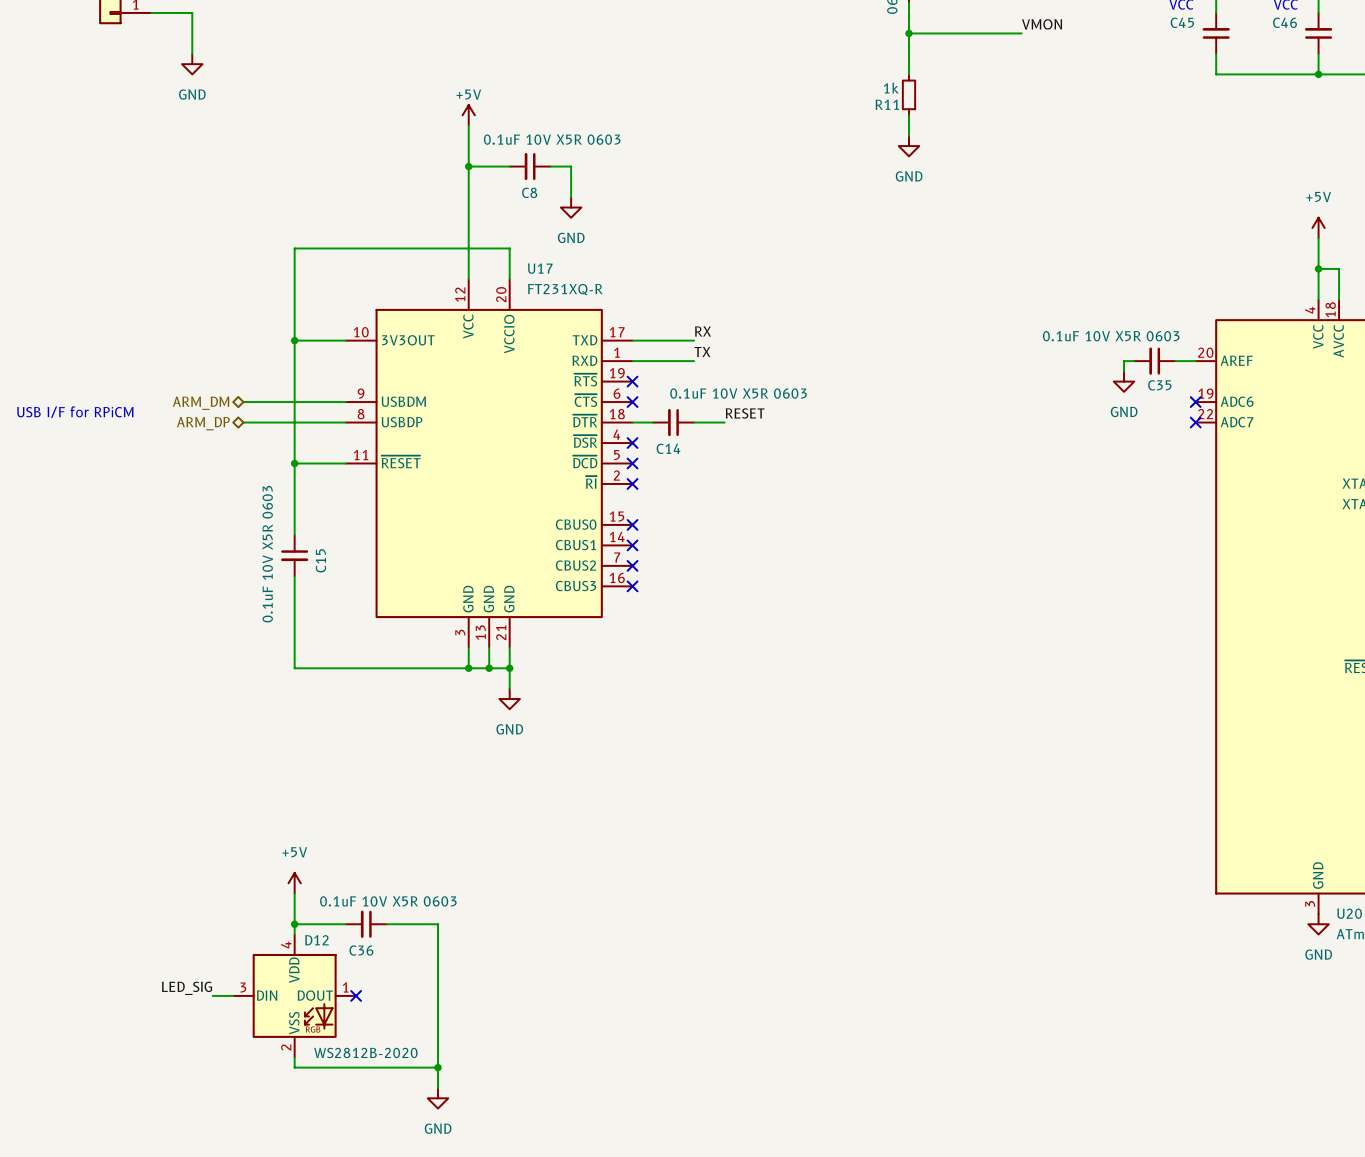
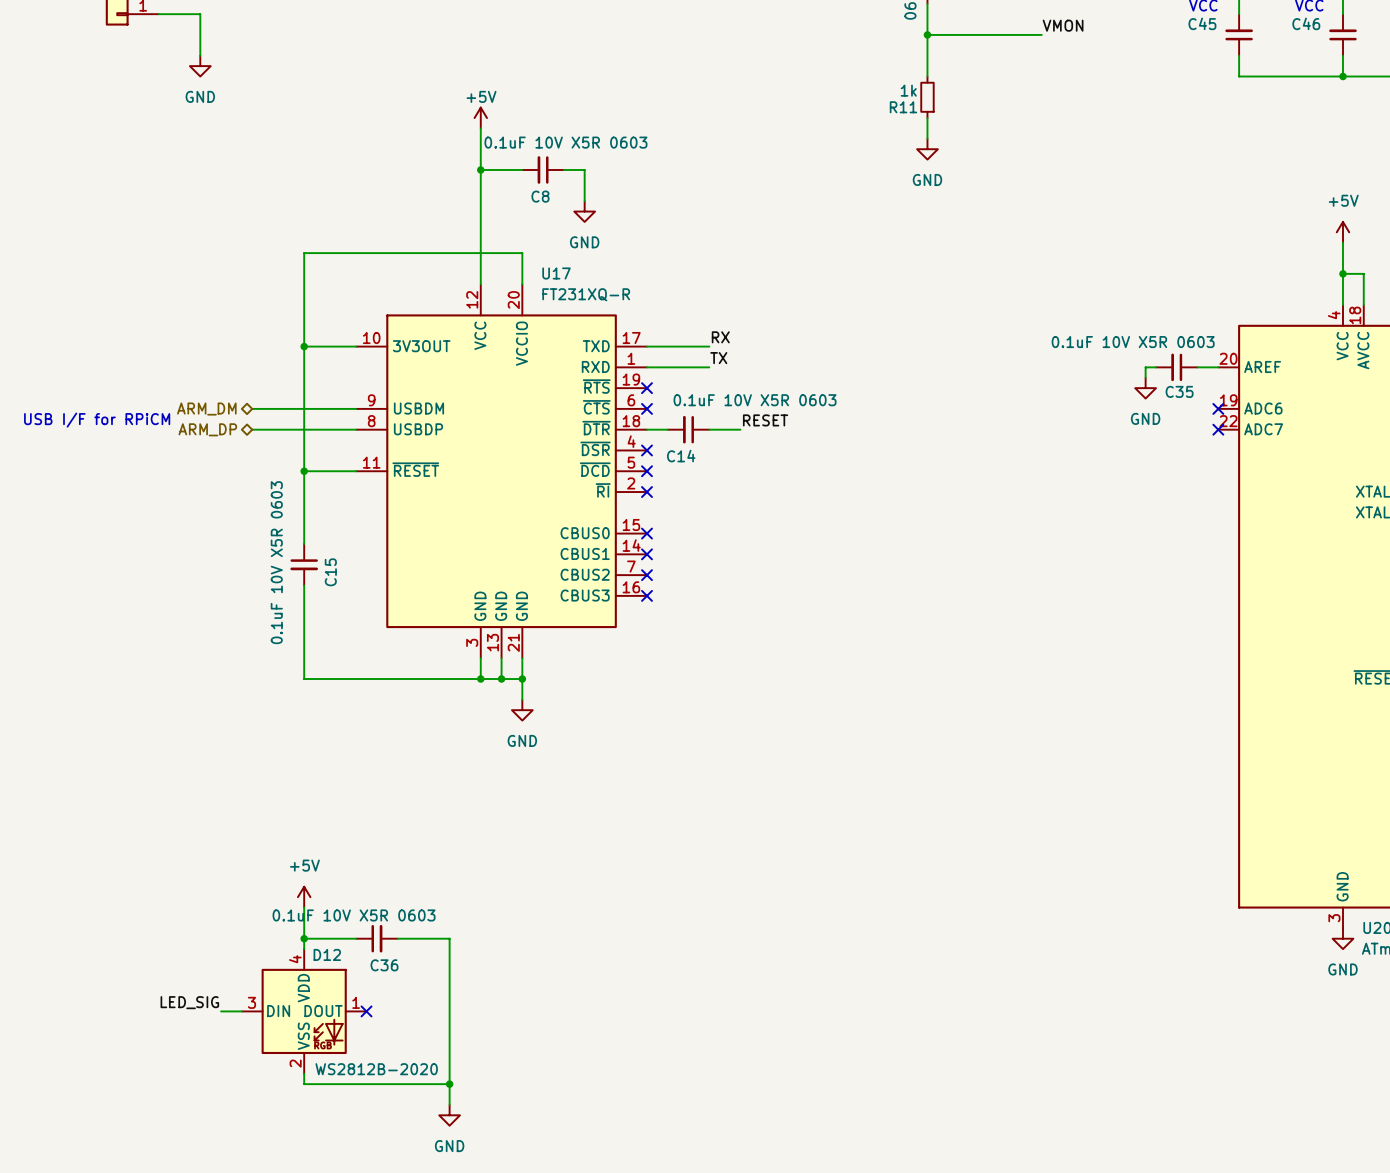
C36 text position: 0.1uF 10V X5R 0603 (388, 901) -> 0.1uF 10V X5R 0603 (354, 915)
C36 rotation: 0° (366, 924) -> 180° (376, 938)
C36 name position: C36 (361, 950) -> C36 (384, 965)

